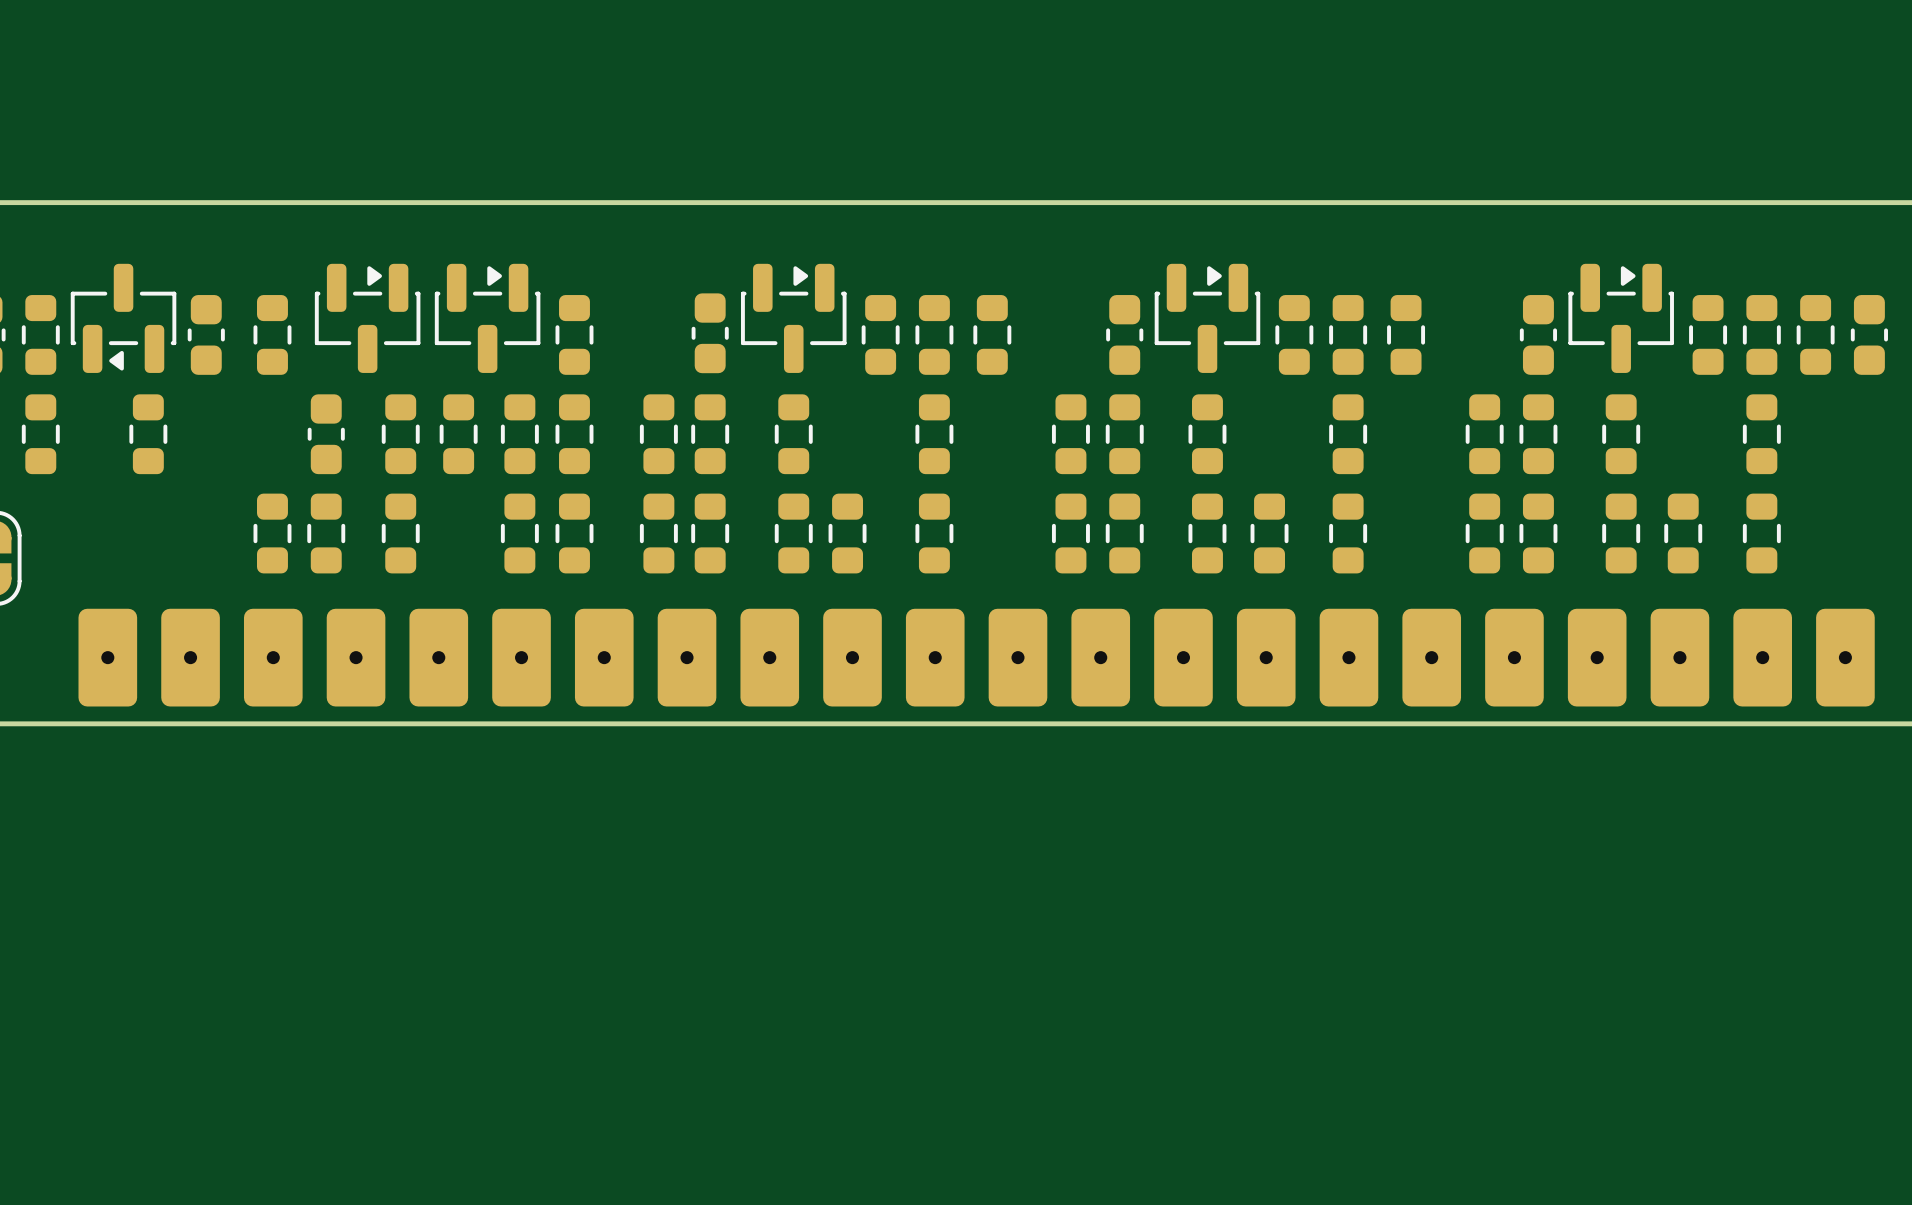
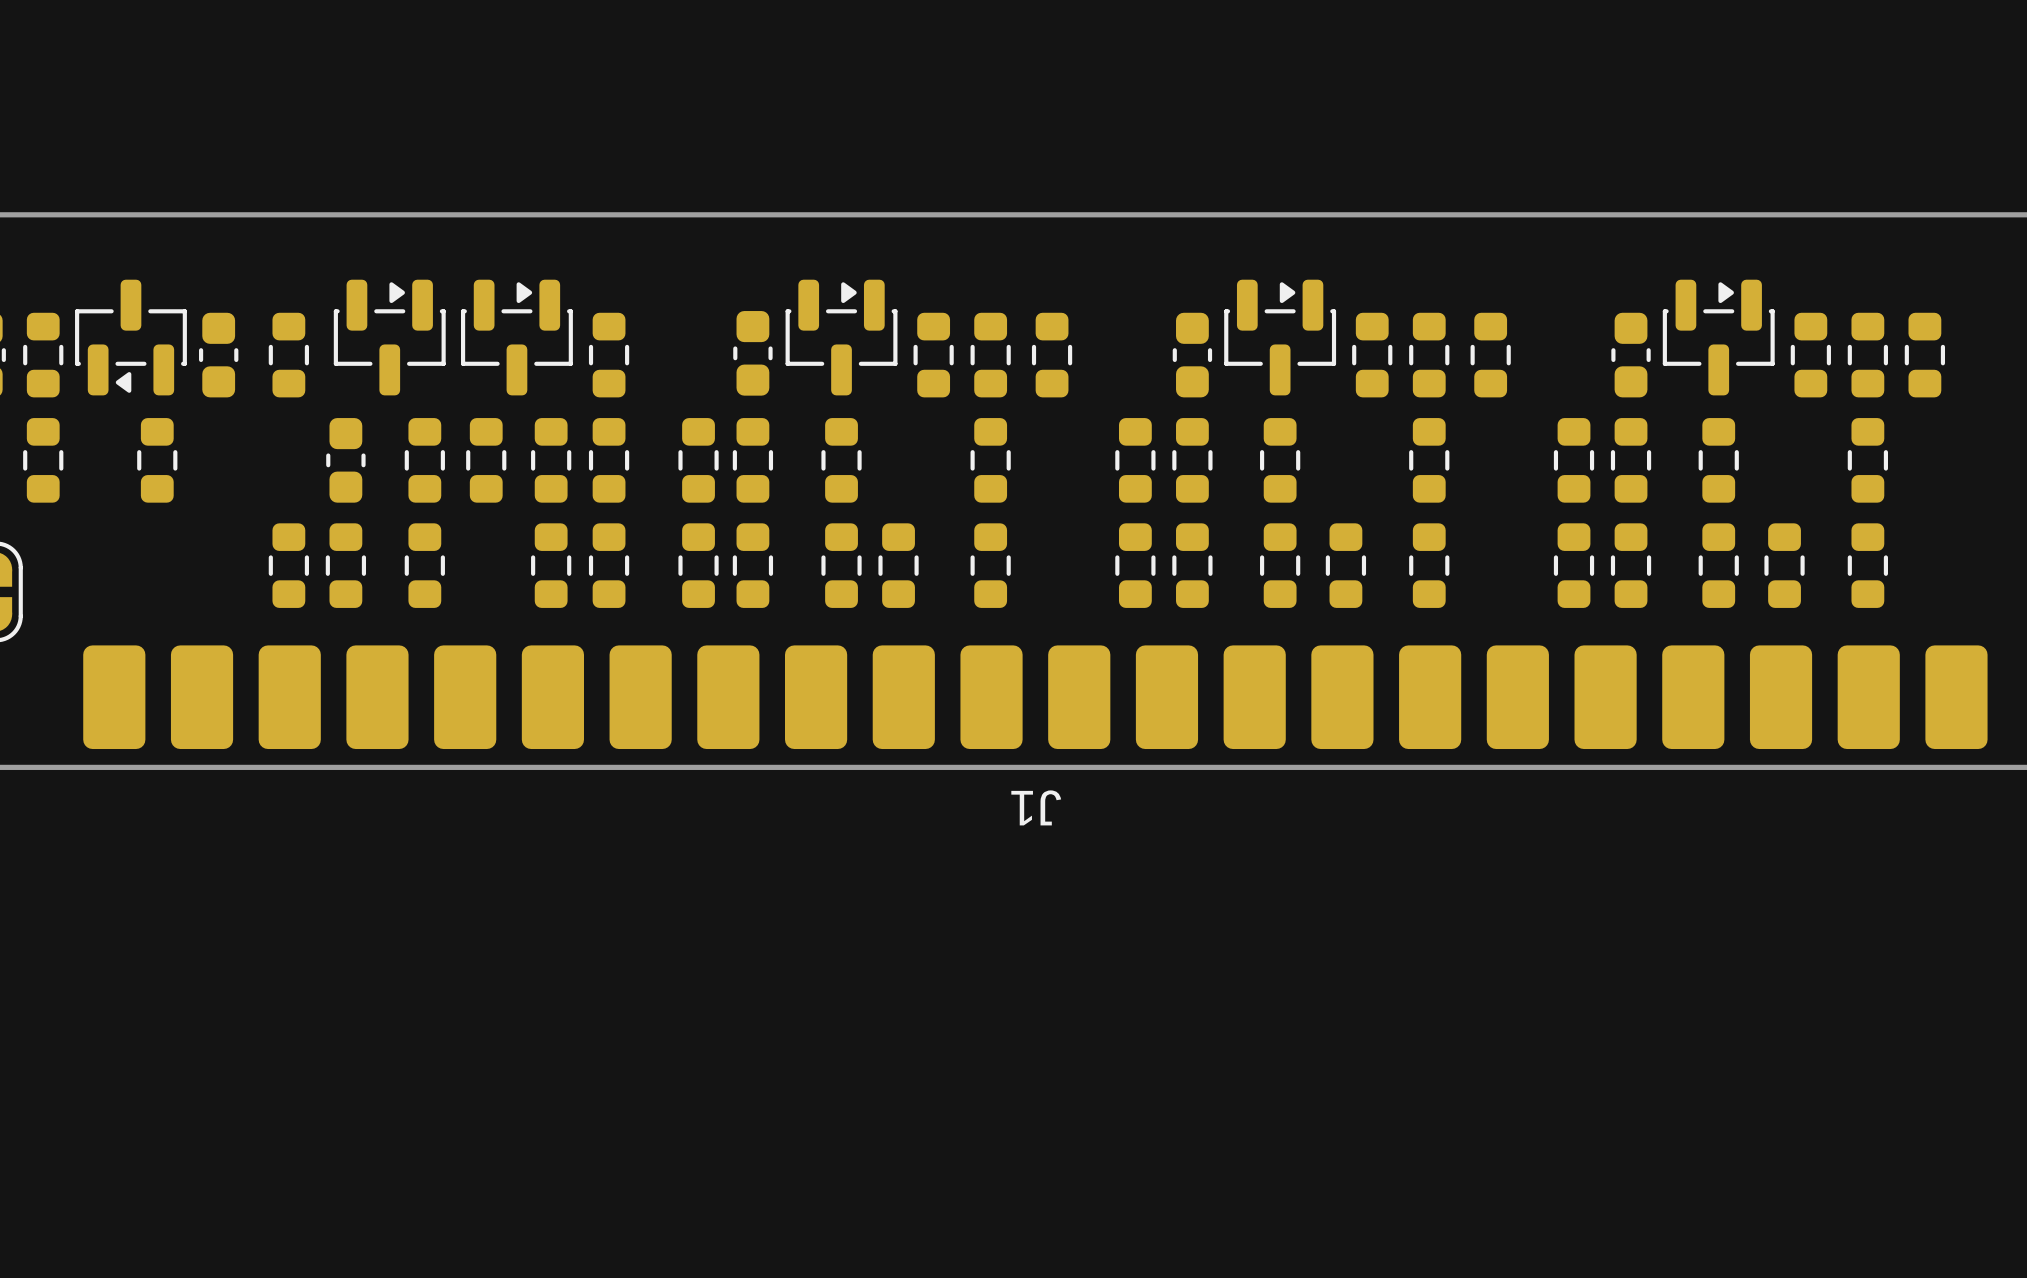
part: (1869, 334) -> none
part: (976, 657) -> none
J1: none -> (1035, 697)

